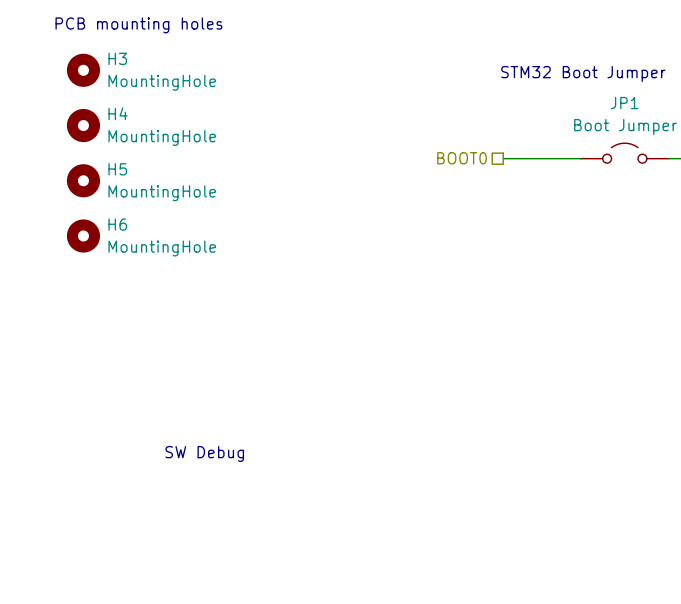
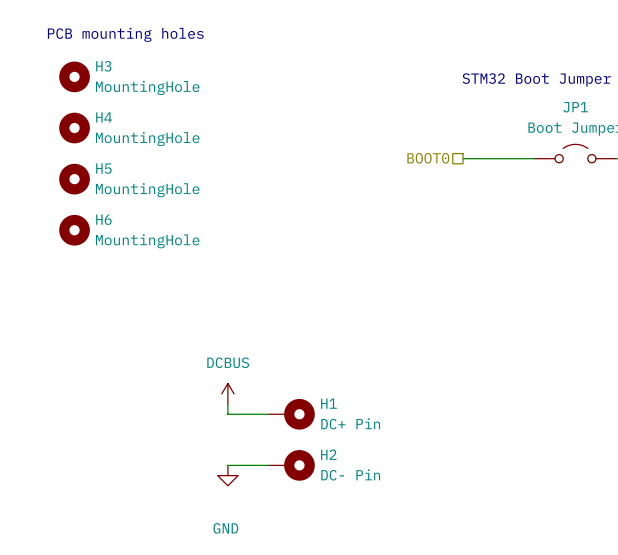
power symbol: none -> DCBUS (227, 393)
wire: none -> (227, 404) (227, 414) (268, 414)
H1: none -> DC+ Pin (291, 414)
text: SW Debug (204, 453) -> none
wire: none -> (227, 465) (268, 465)
H2: none -> DC- Pin (291, 465)
power symbol: none -> GND (227, 475)

